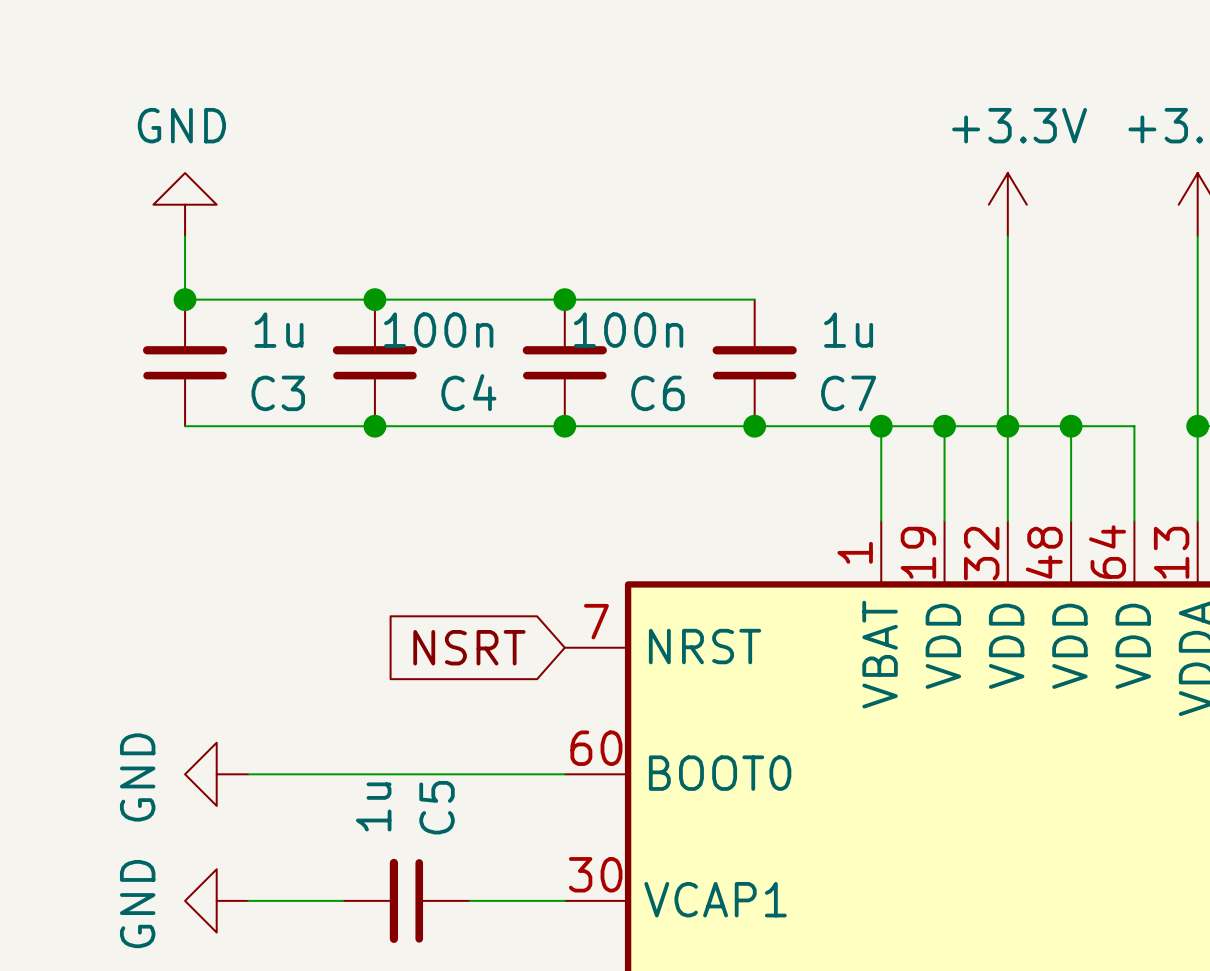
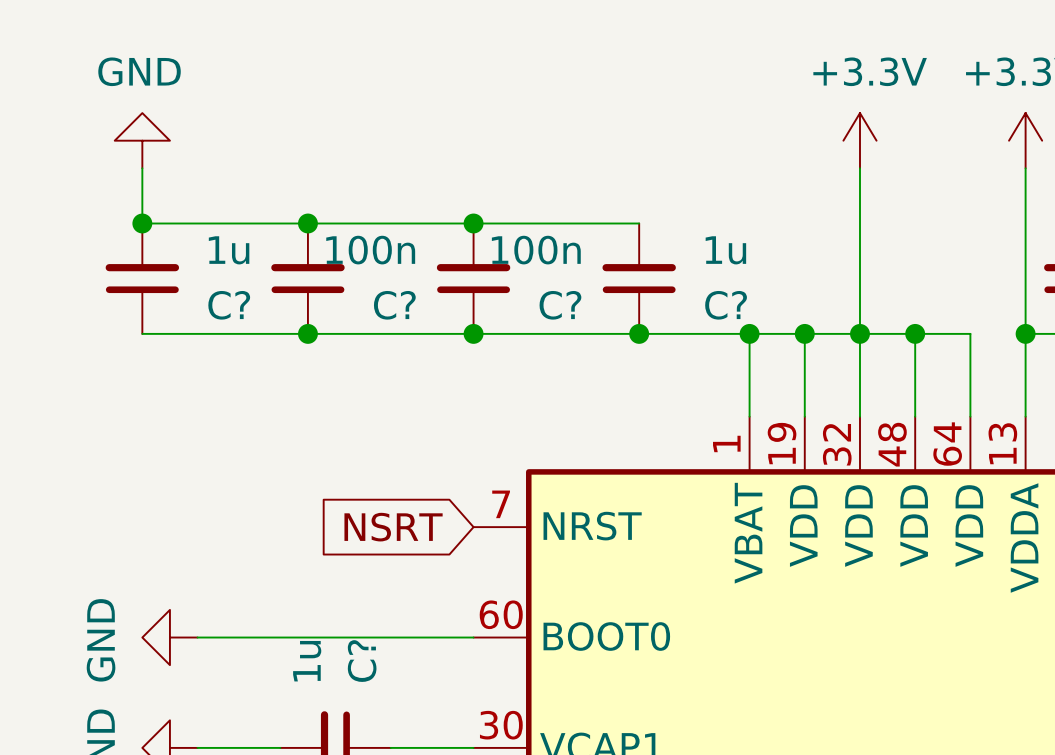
C4 name: C4 (468, 392) -> C? (394, 305)
C3 name: C3 (278, 393) -> C? (229, 305)
C6 name: C6 (657, 393) -> C? (560, 305)
C7 name: C7 (848, 393) -> C? (726, 305)
C5 name: C5 (437, 807) -> C? (362, 661)

